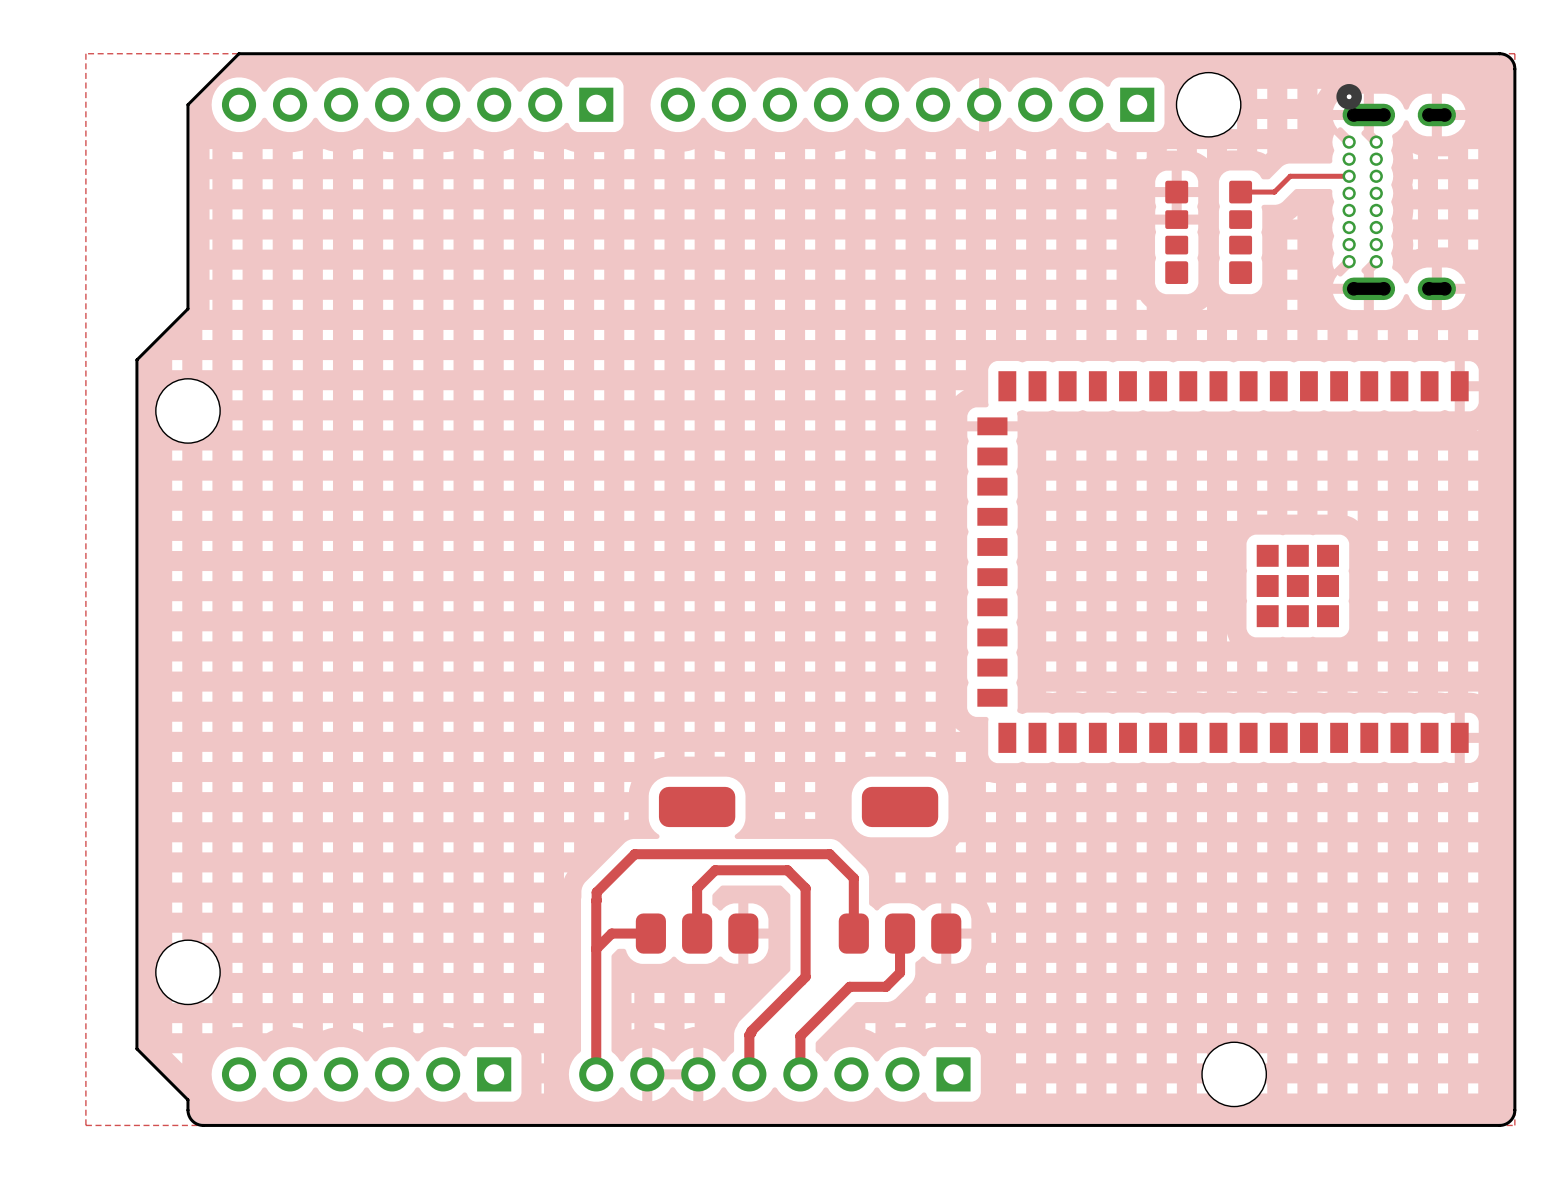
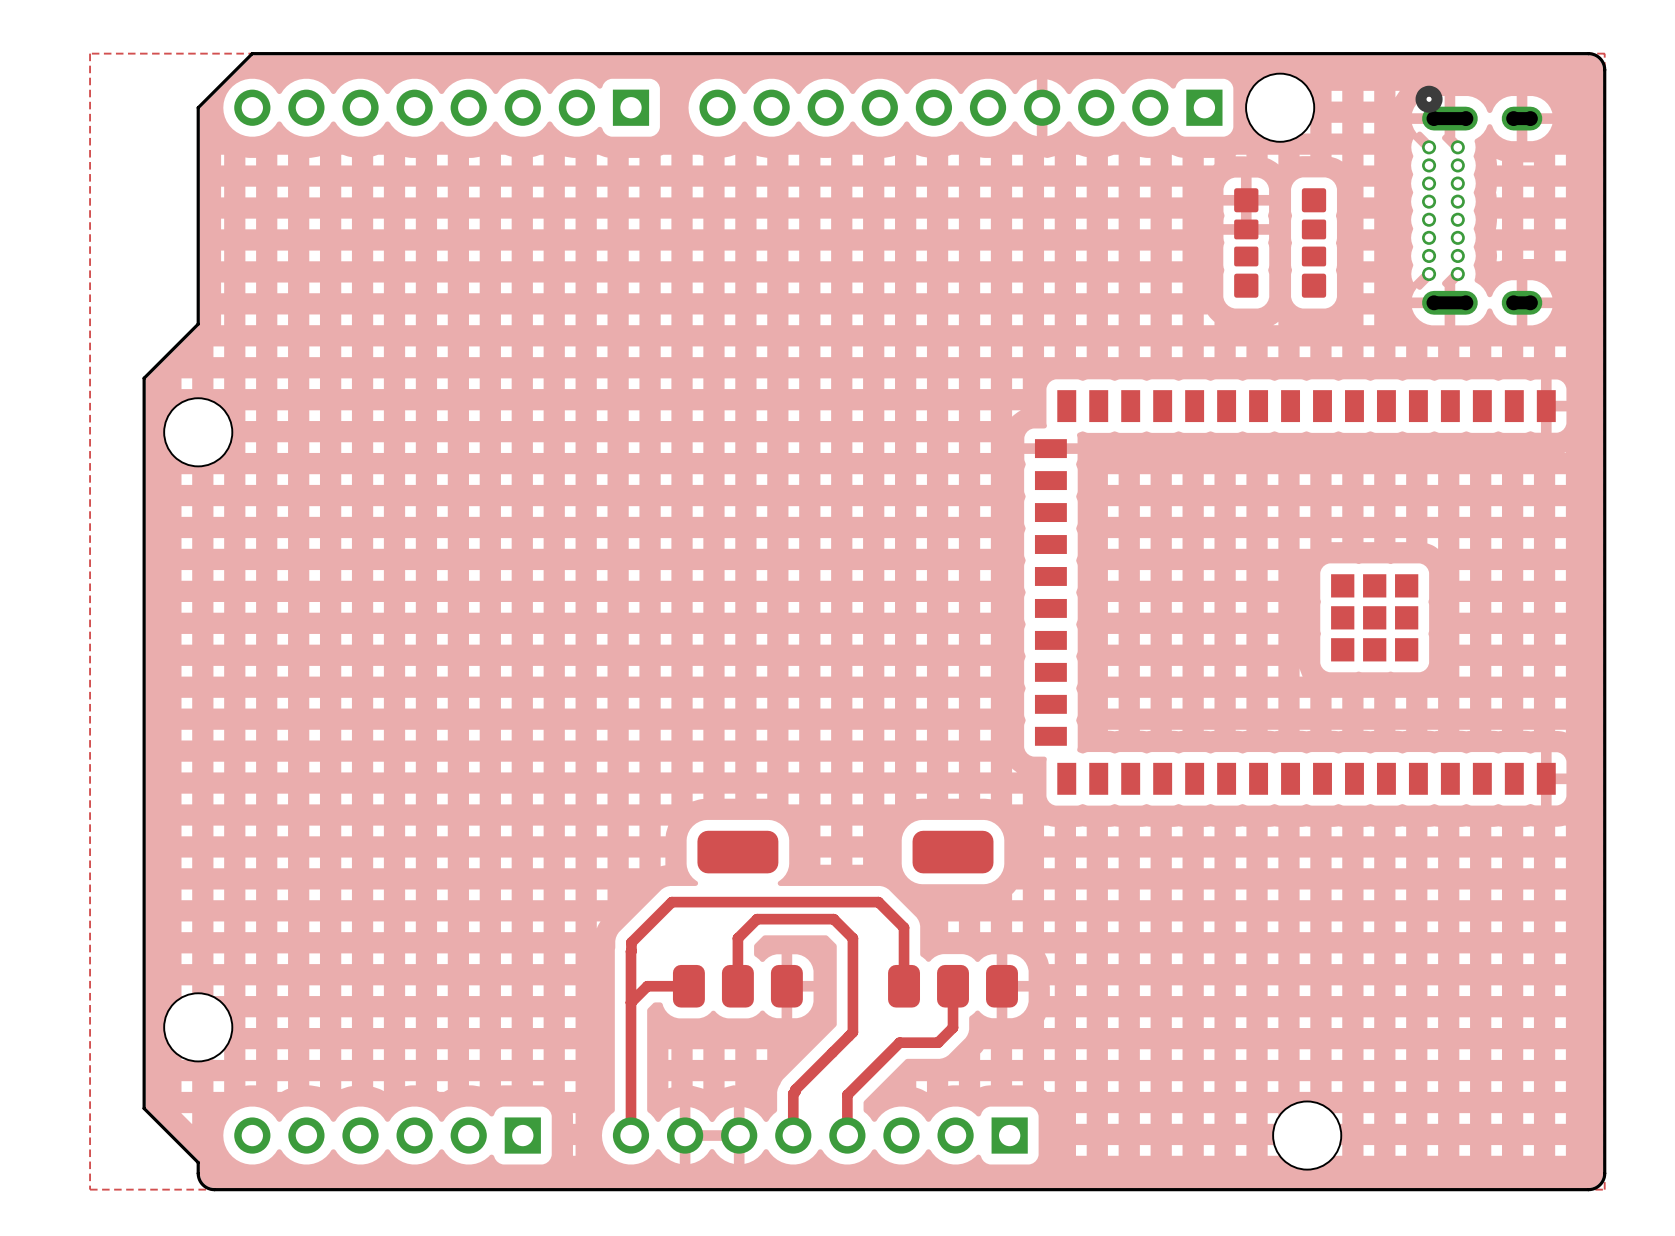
top track: (1349, 176) (1290, 176) (1274, 192) (1240, 192) -> none

